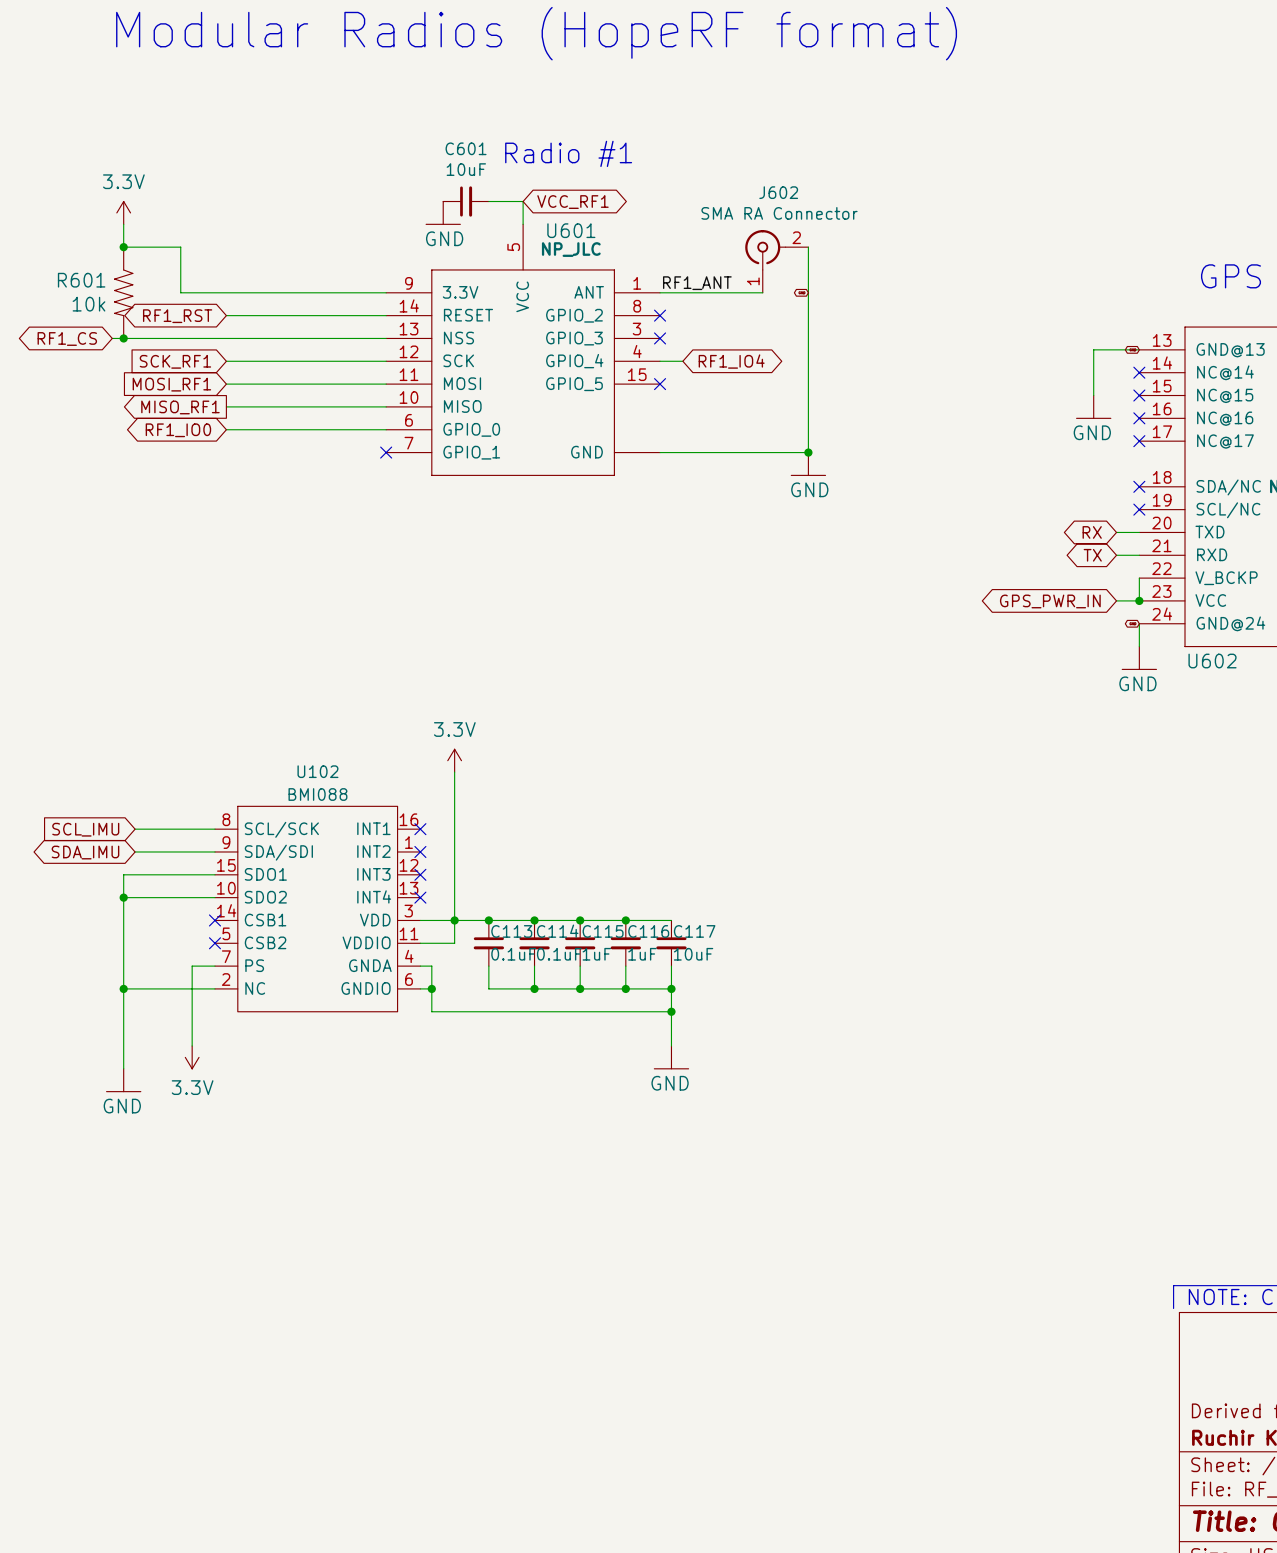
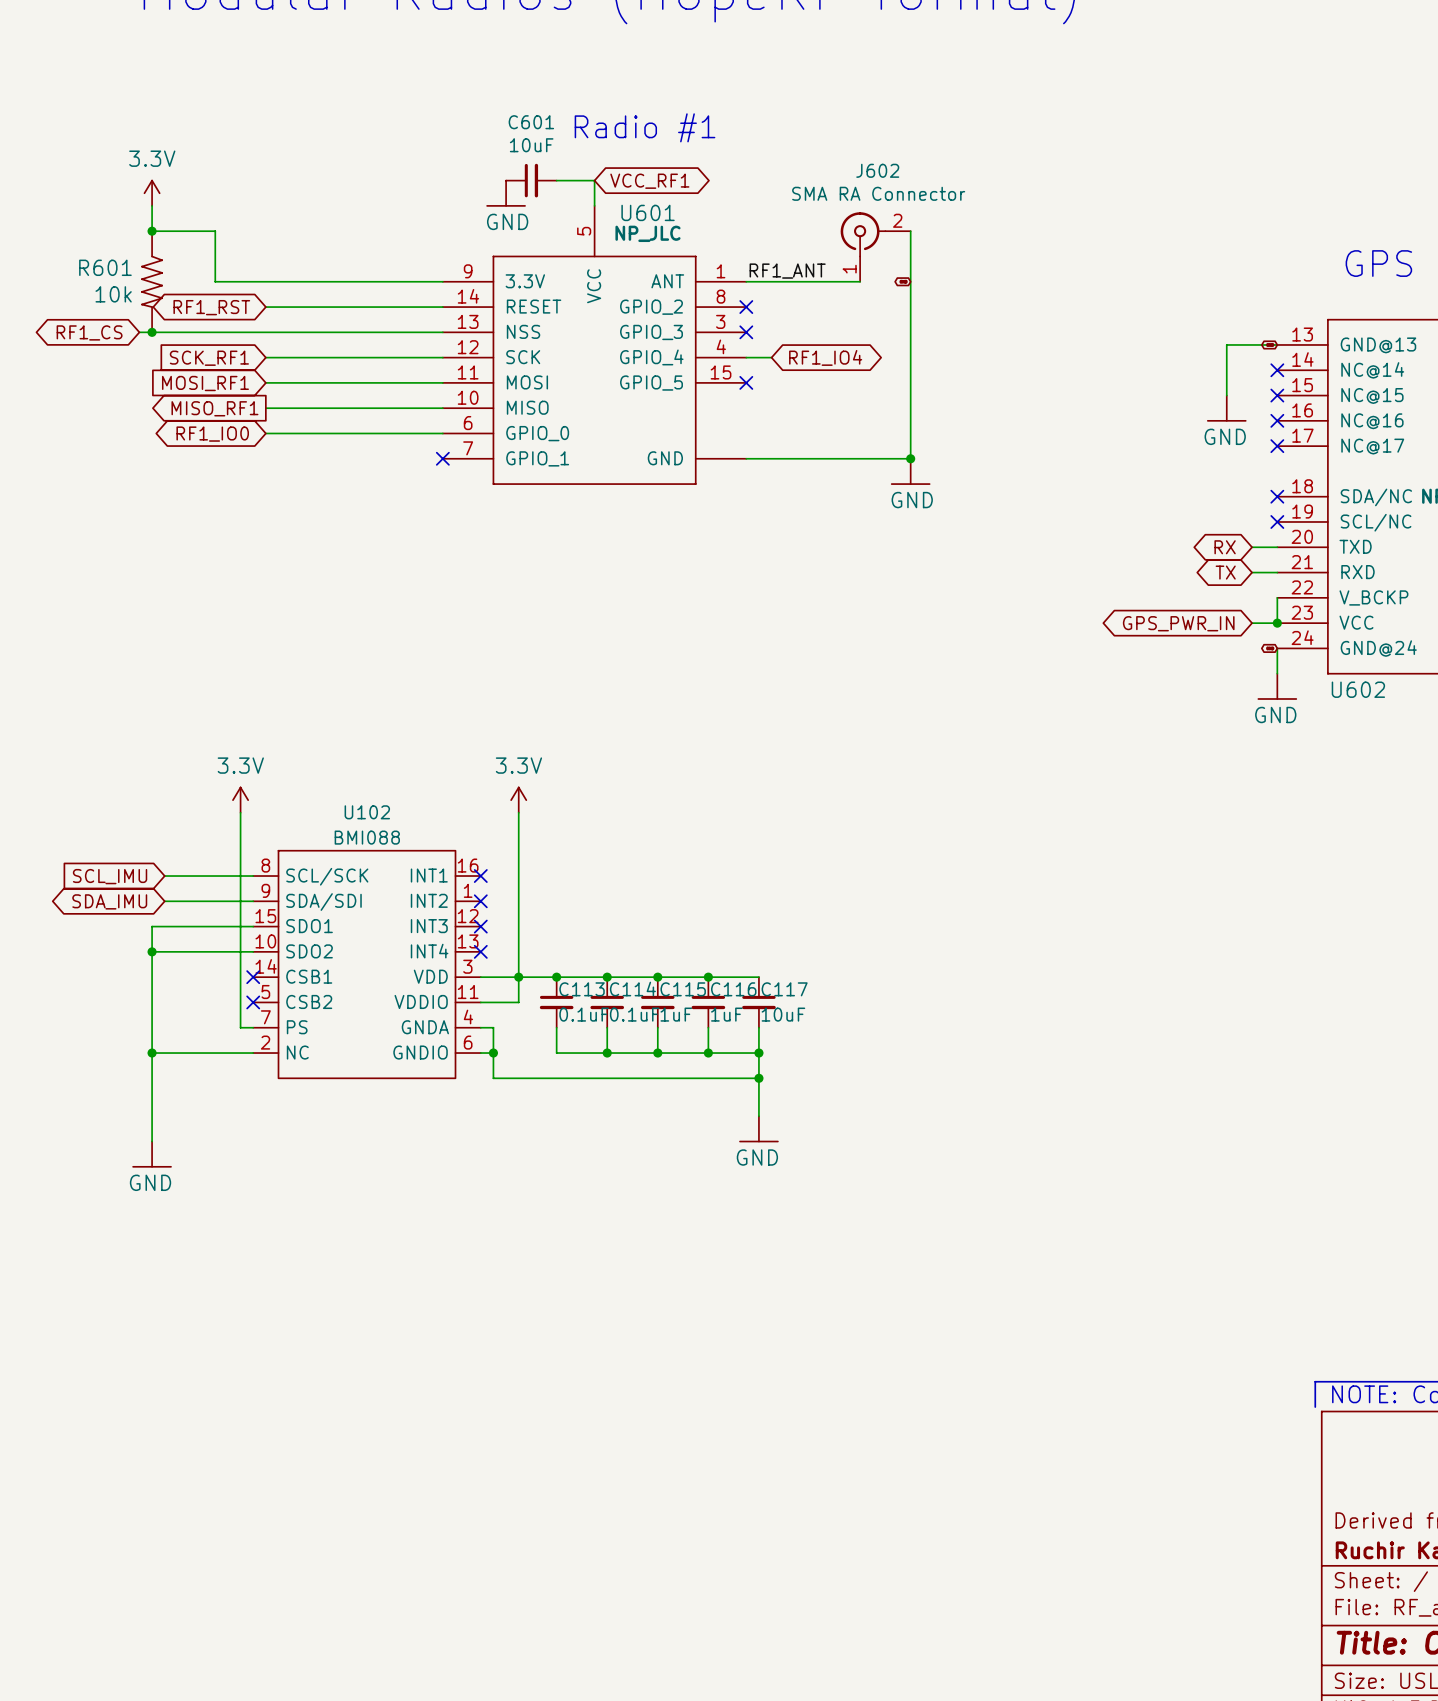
power symbol: none -> 3.3V (240, 800)
wire: (203, 966) (192, 966) (192, 1045) -> (240, 1027) (240, 812)
power symbol: 3.3V (192, 1057) -> none

